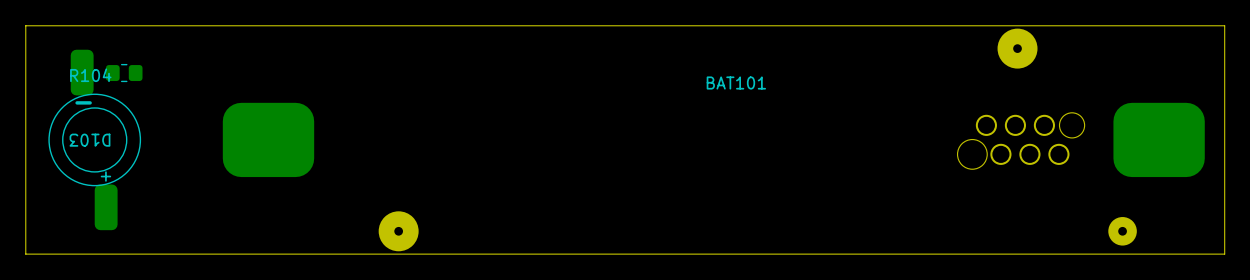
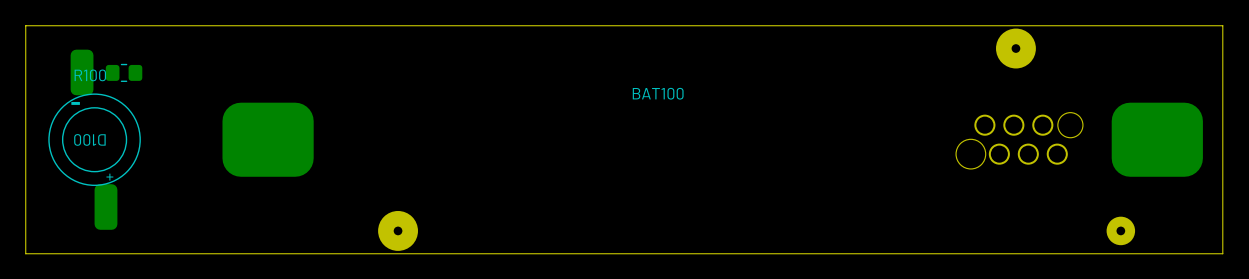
R104 name: R104 (90, 75) -> R100 (90, 75)
BAT101 name: BAT101 (736, 83) -> BAT100 (658, 93)
D103 name: D103 (89, 140) -> D100 (89, 139)

